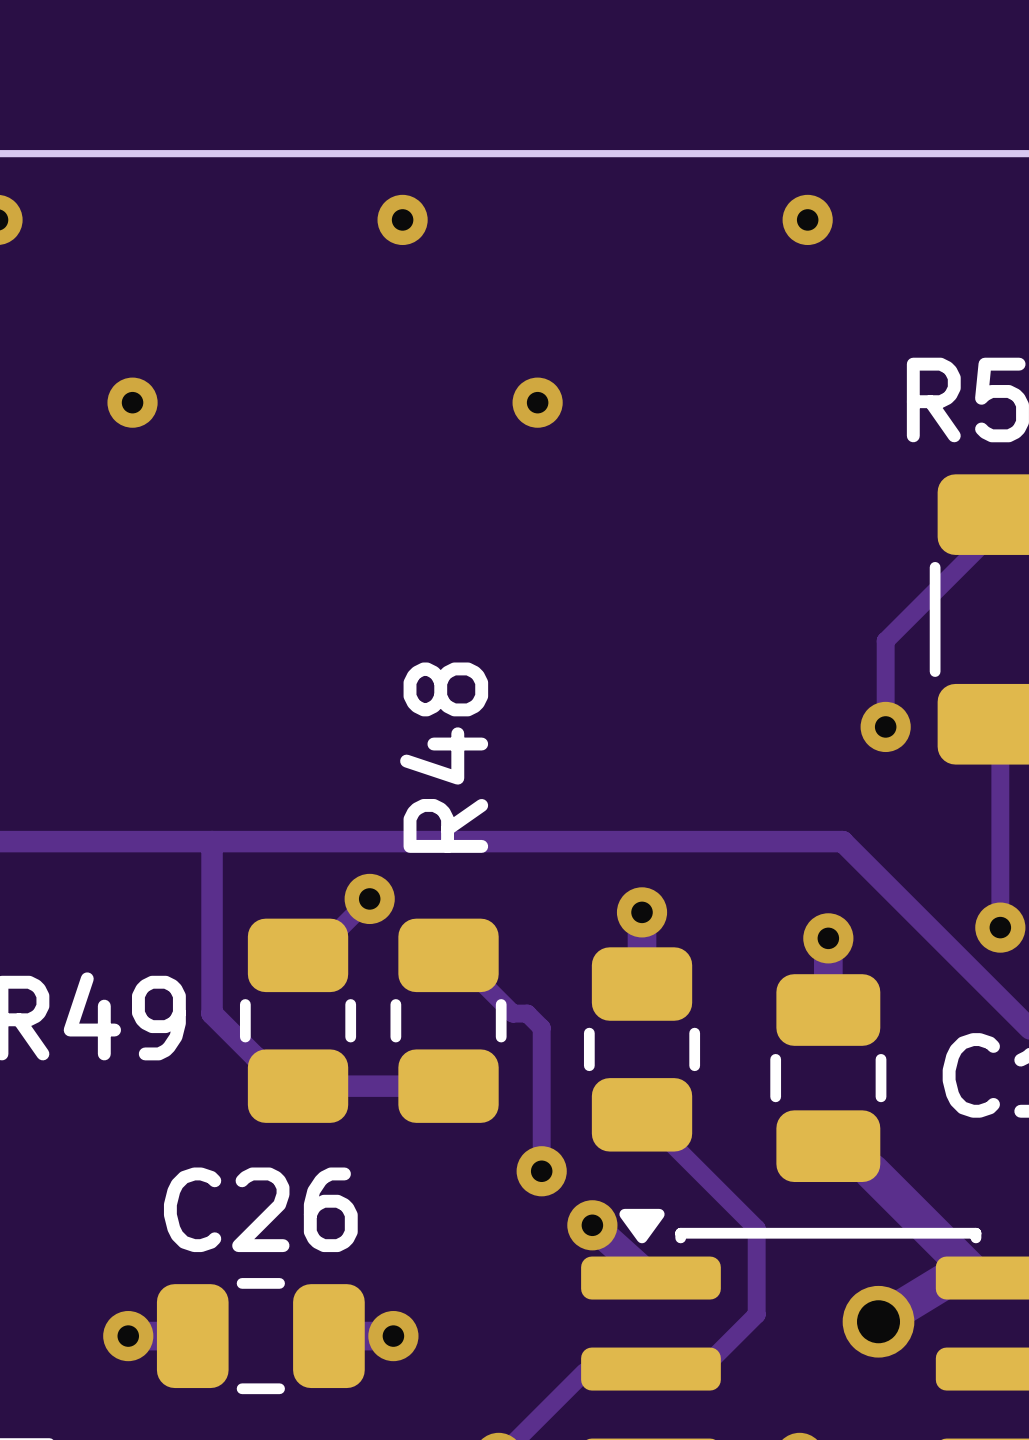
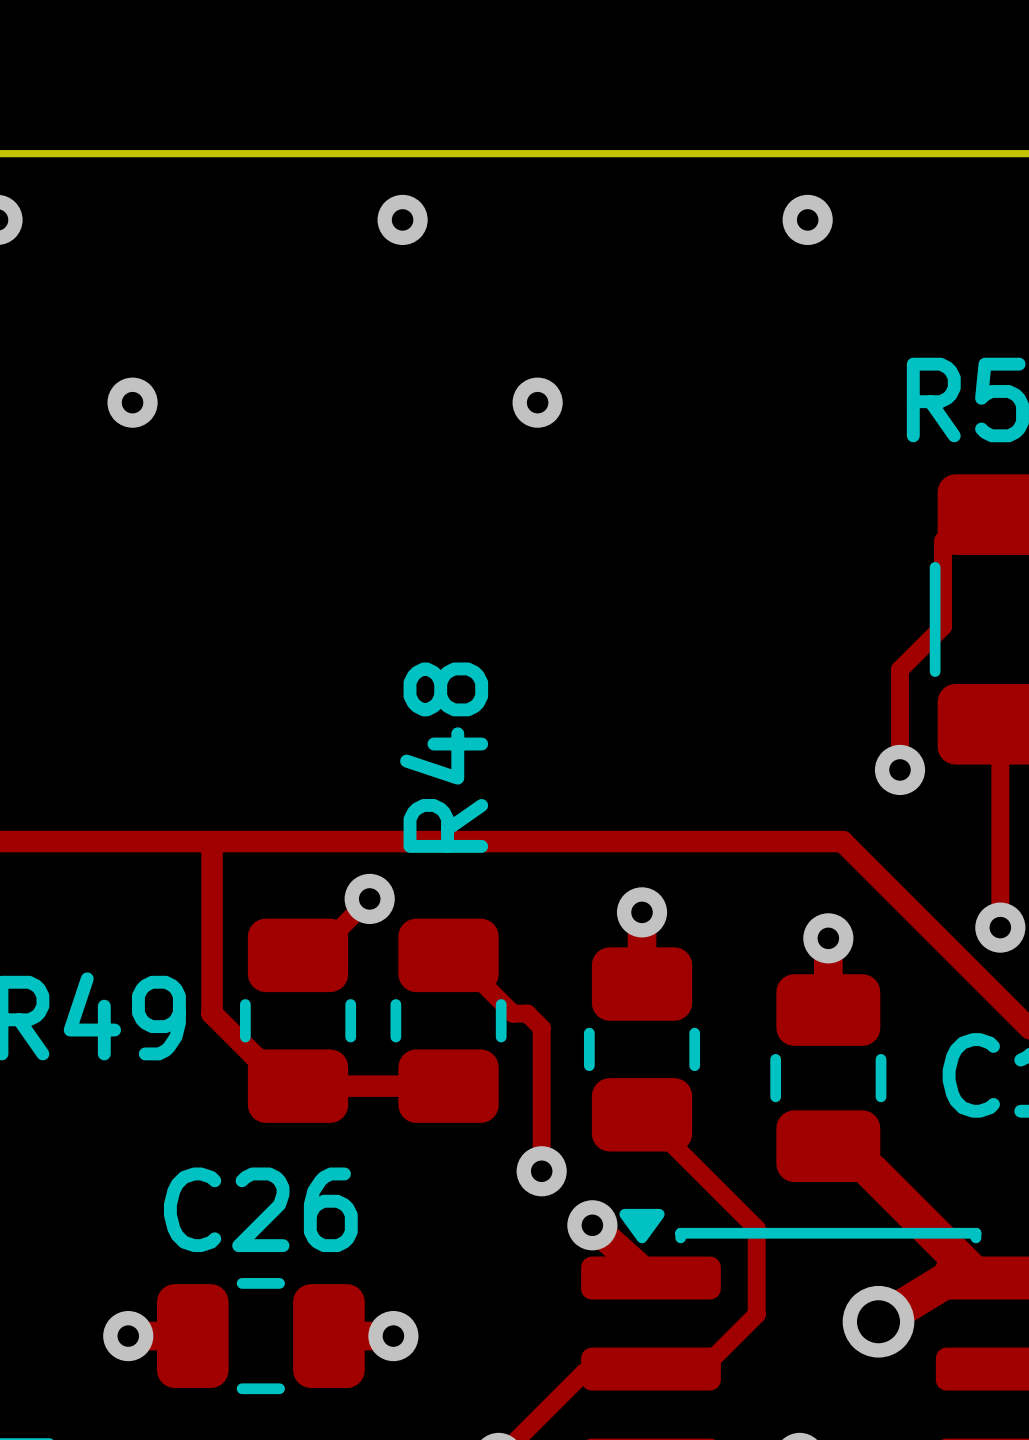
track: none -> (943, 540) (943, 626) (900, 669) (900, 769)
track: (986, 540) (885, 640) (885, 726) -> none
via position: (885, 726) -> (900, 769)

